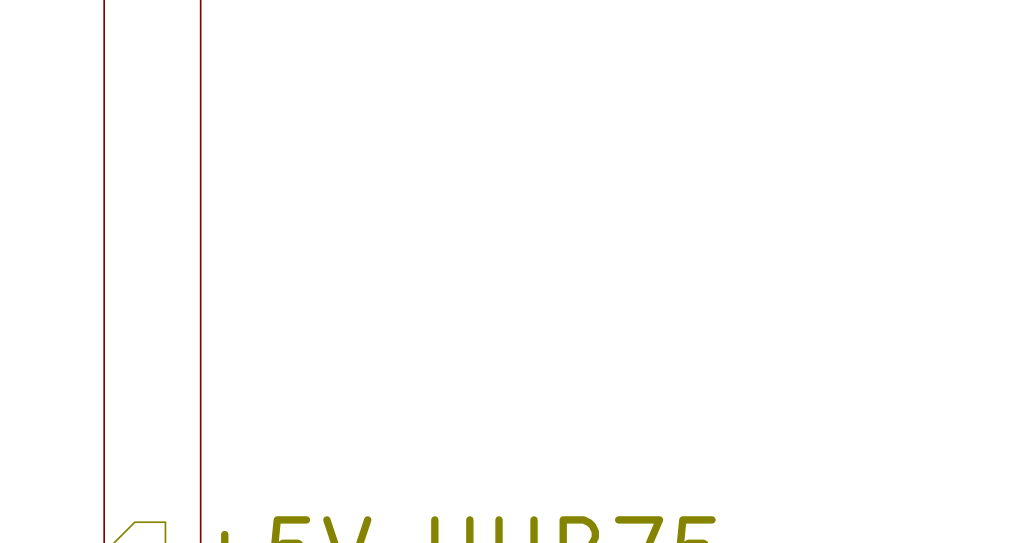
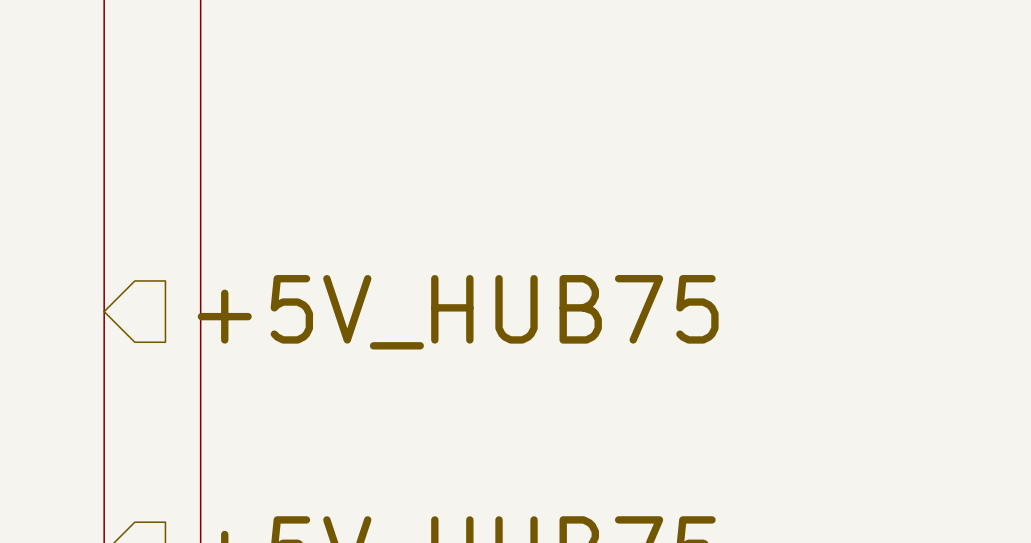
hierarchical label: none -> +5V_HUB75 (458, 312)

